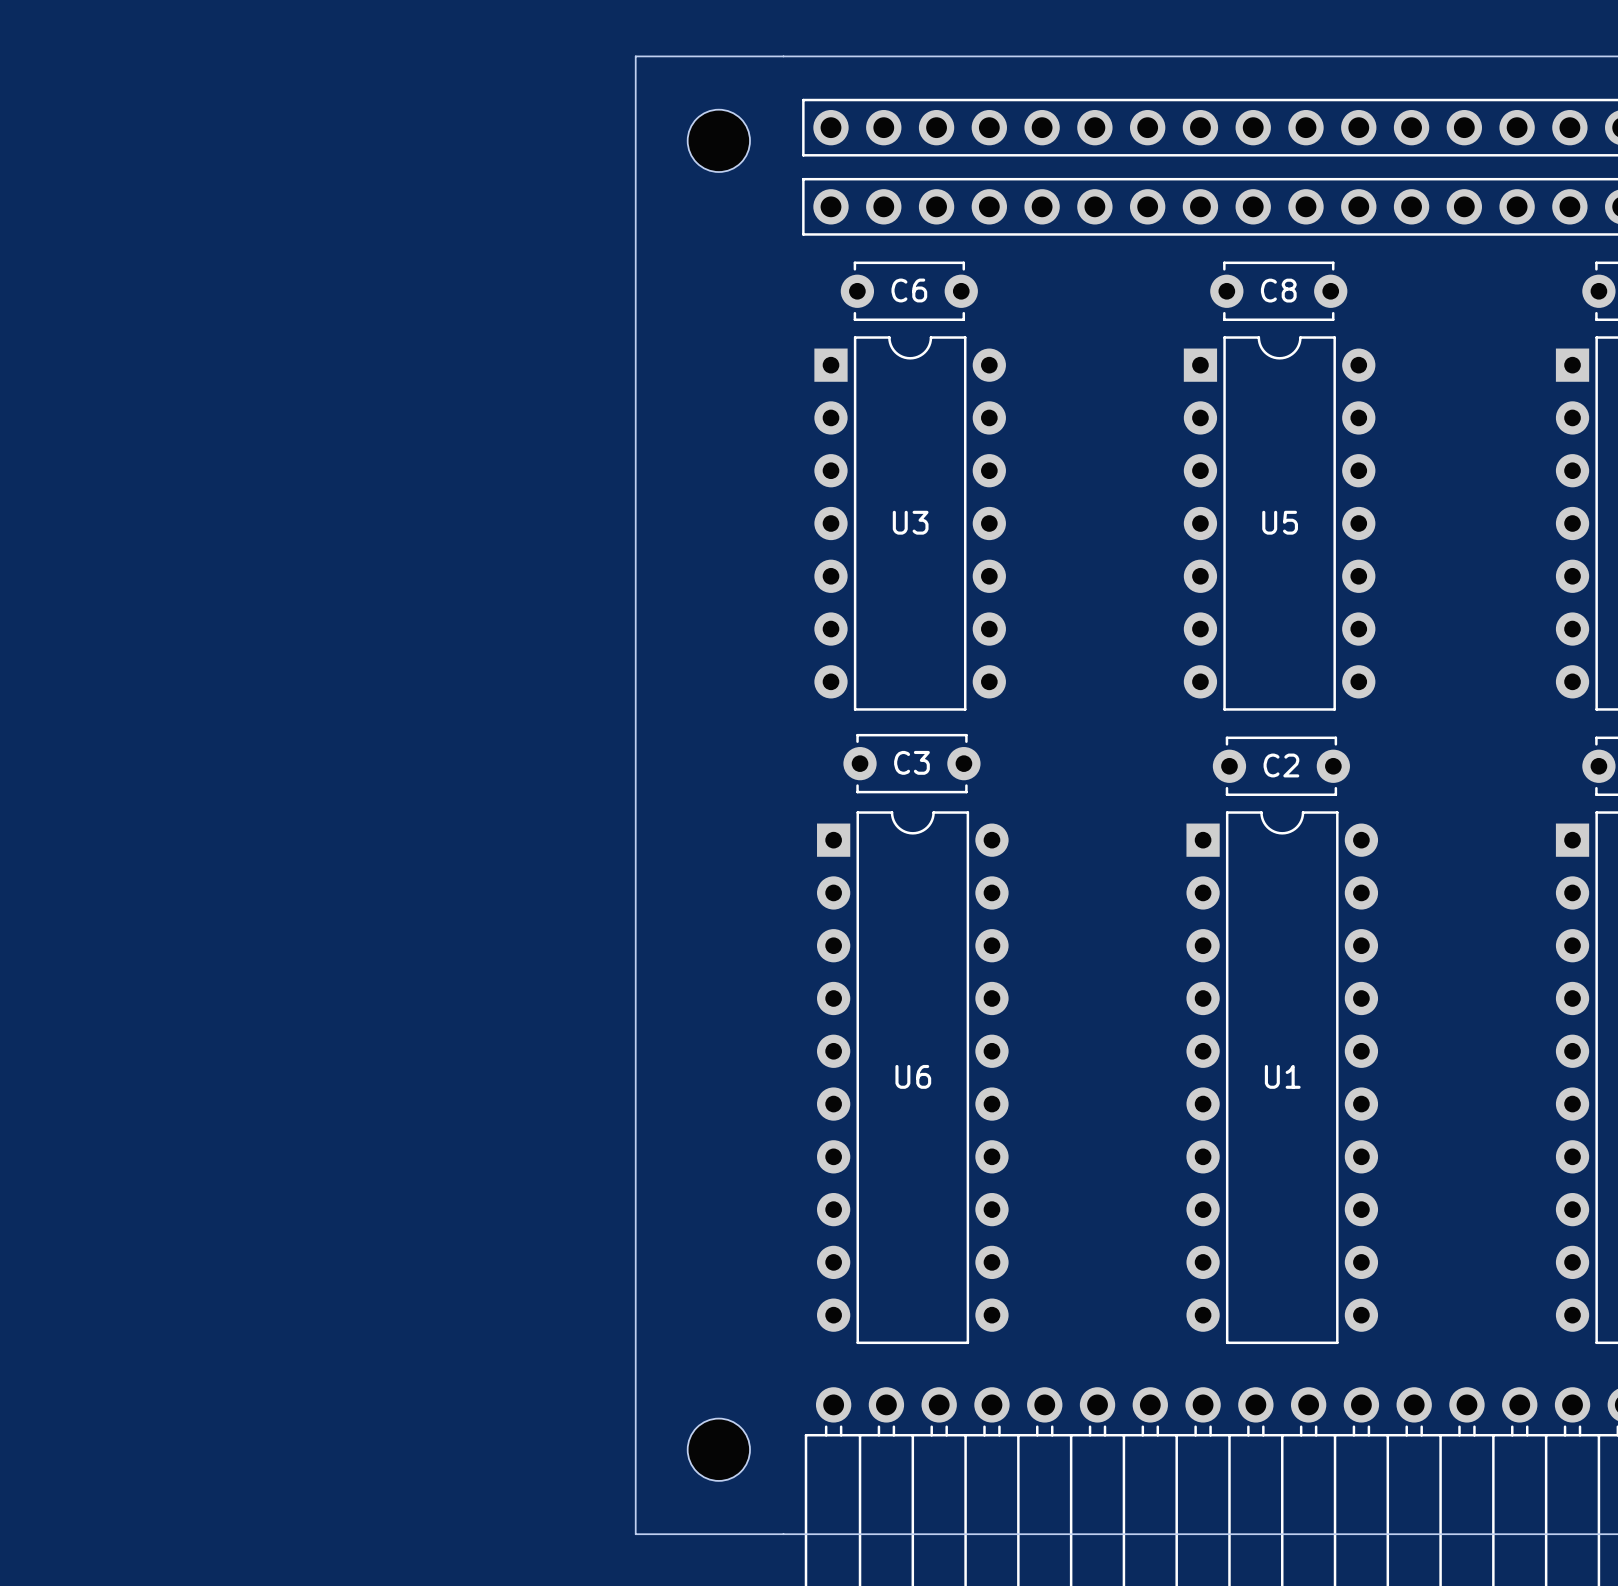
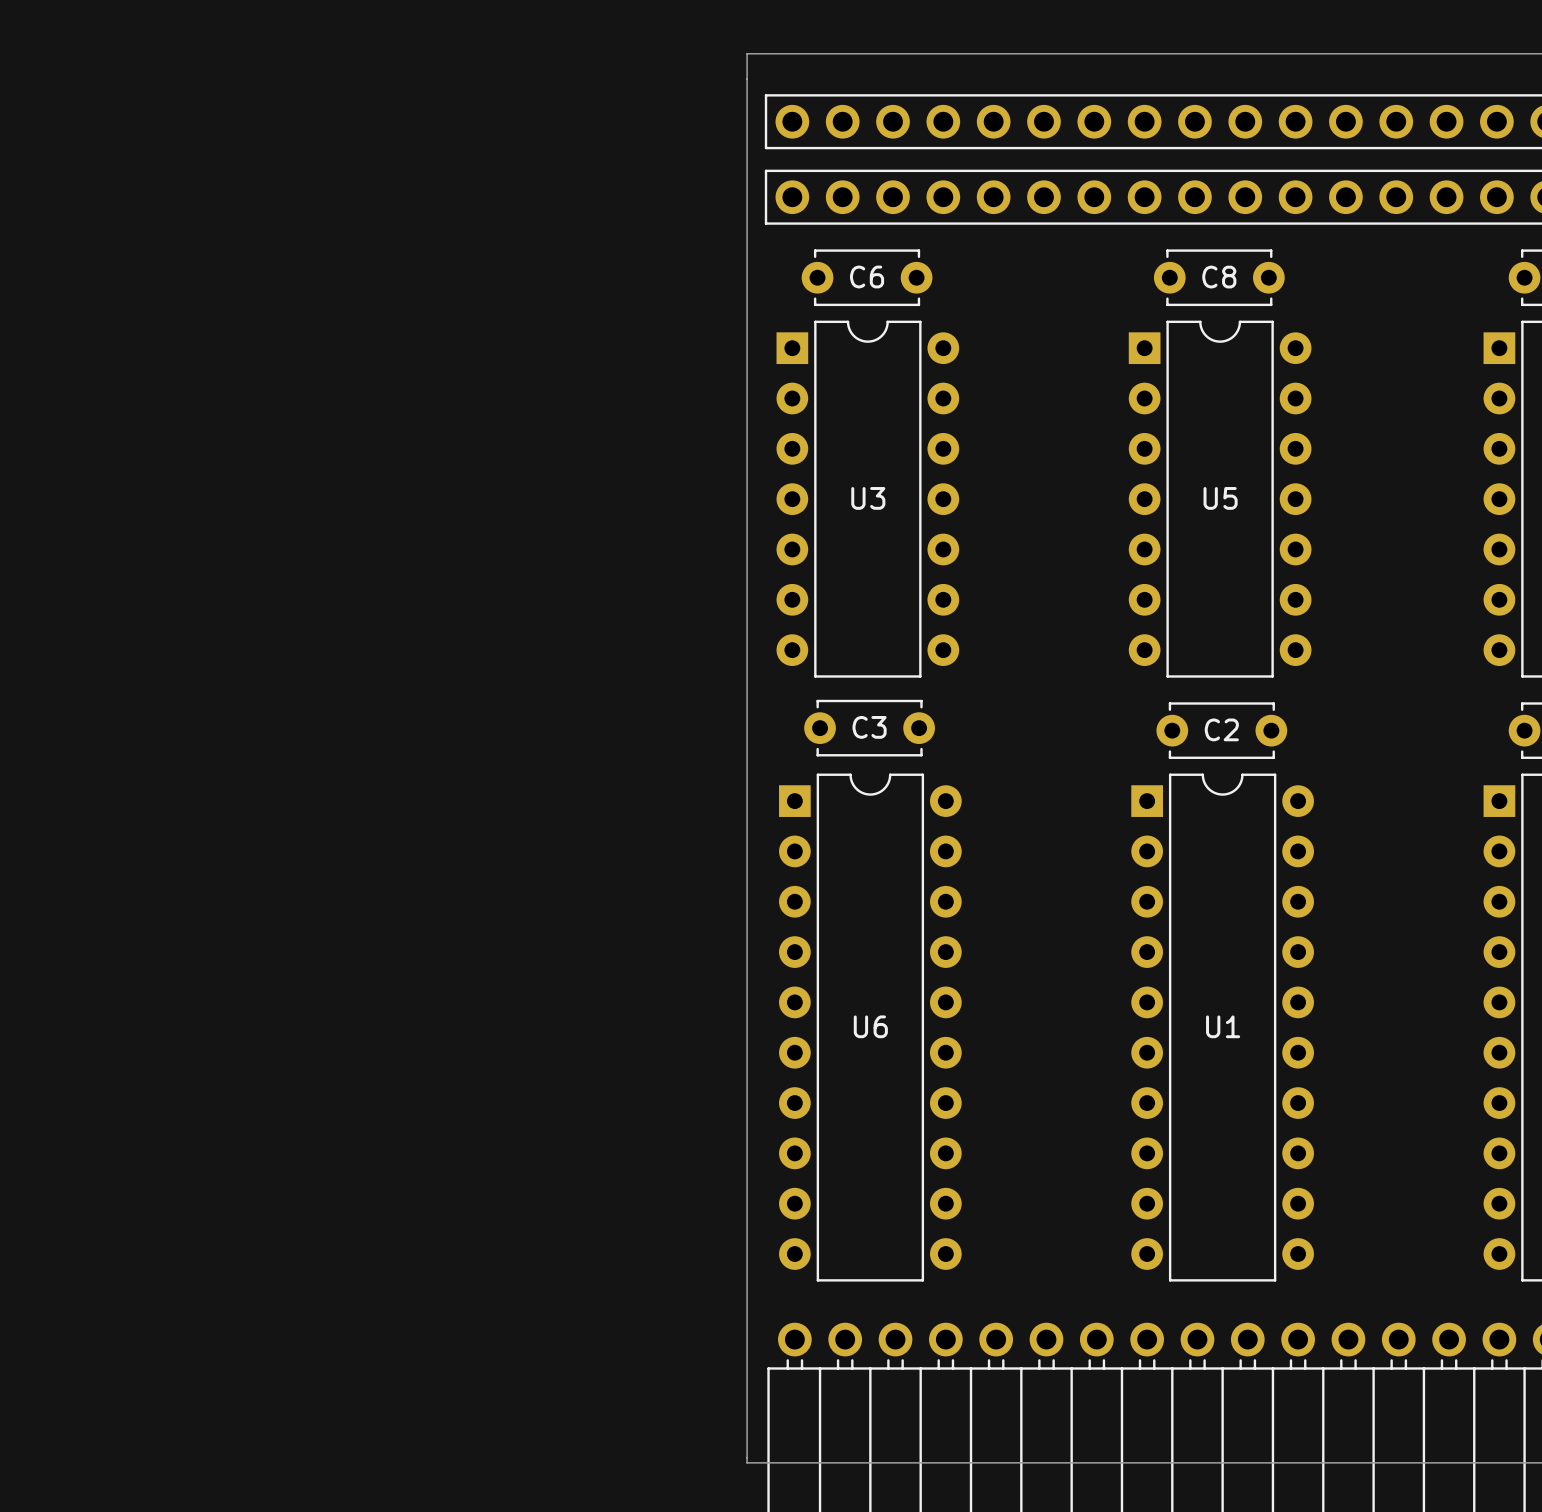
board edge: (783, 56) (635, 56) (635, 1534) (783, 1534) -> (747, 53) (747, 1462)
part: (718, 140) -> none
part: (718, 1449) -> none

